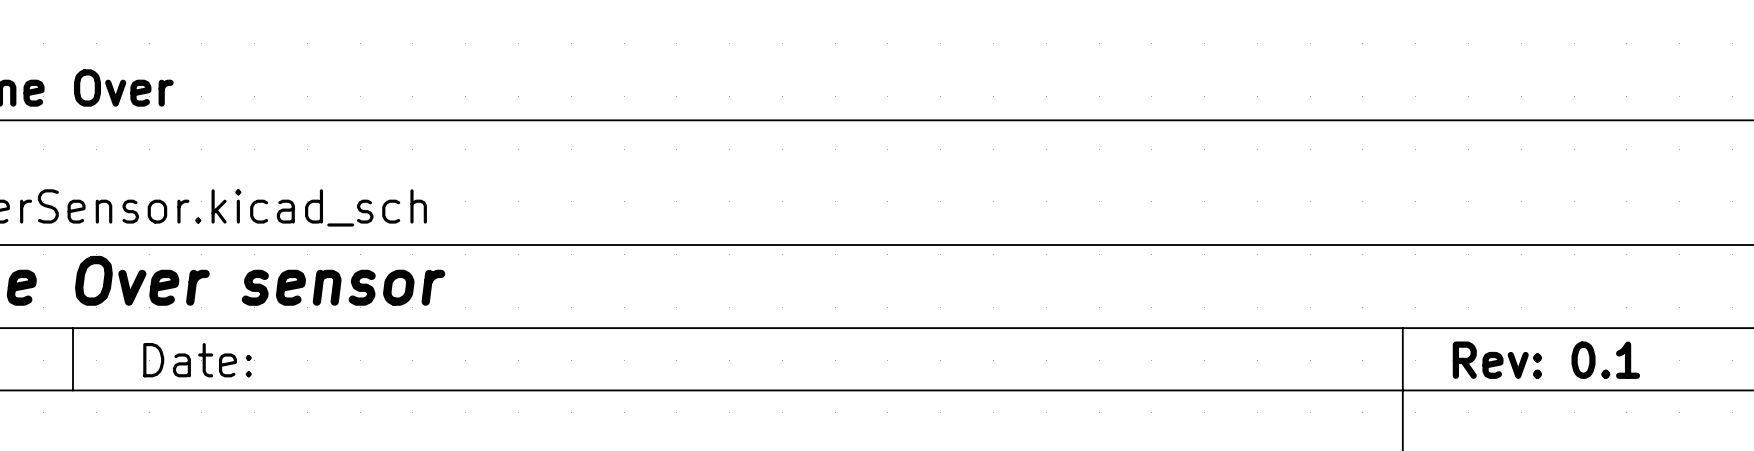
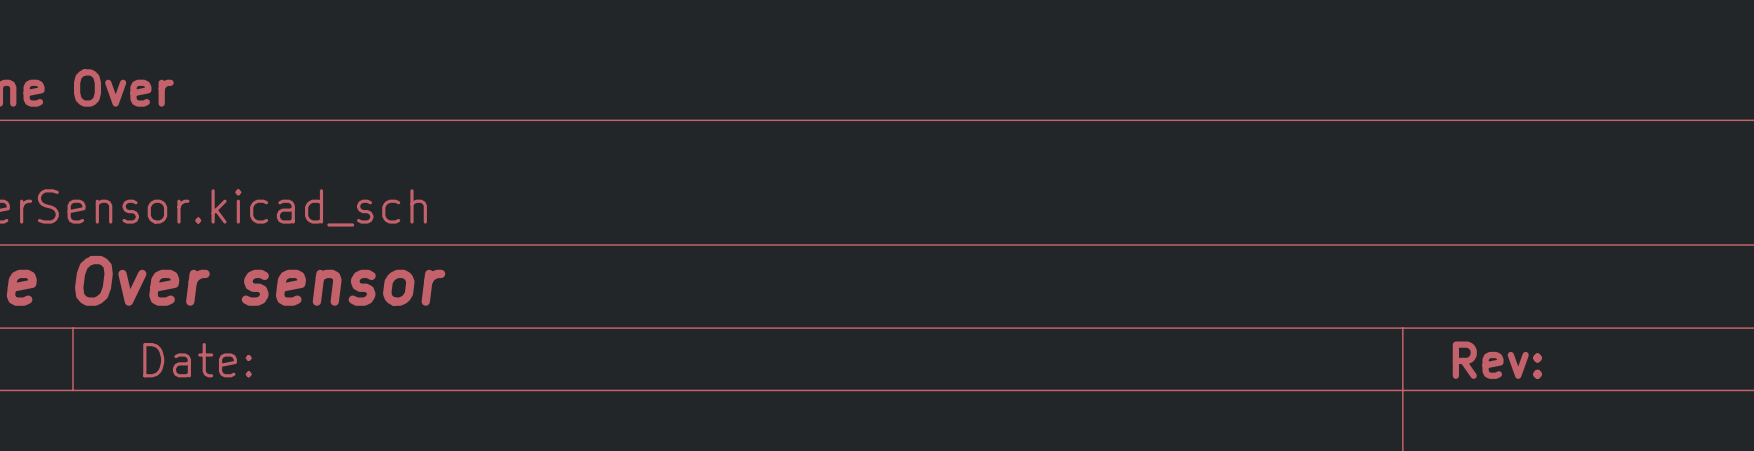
title block: Rev: 0.1 (1546, 360) -> Rev: (1497, 360)

